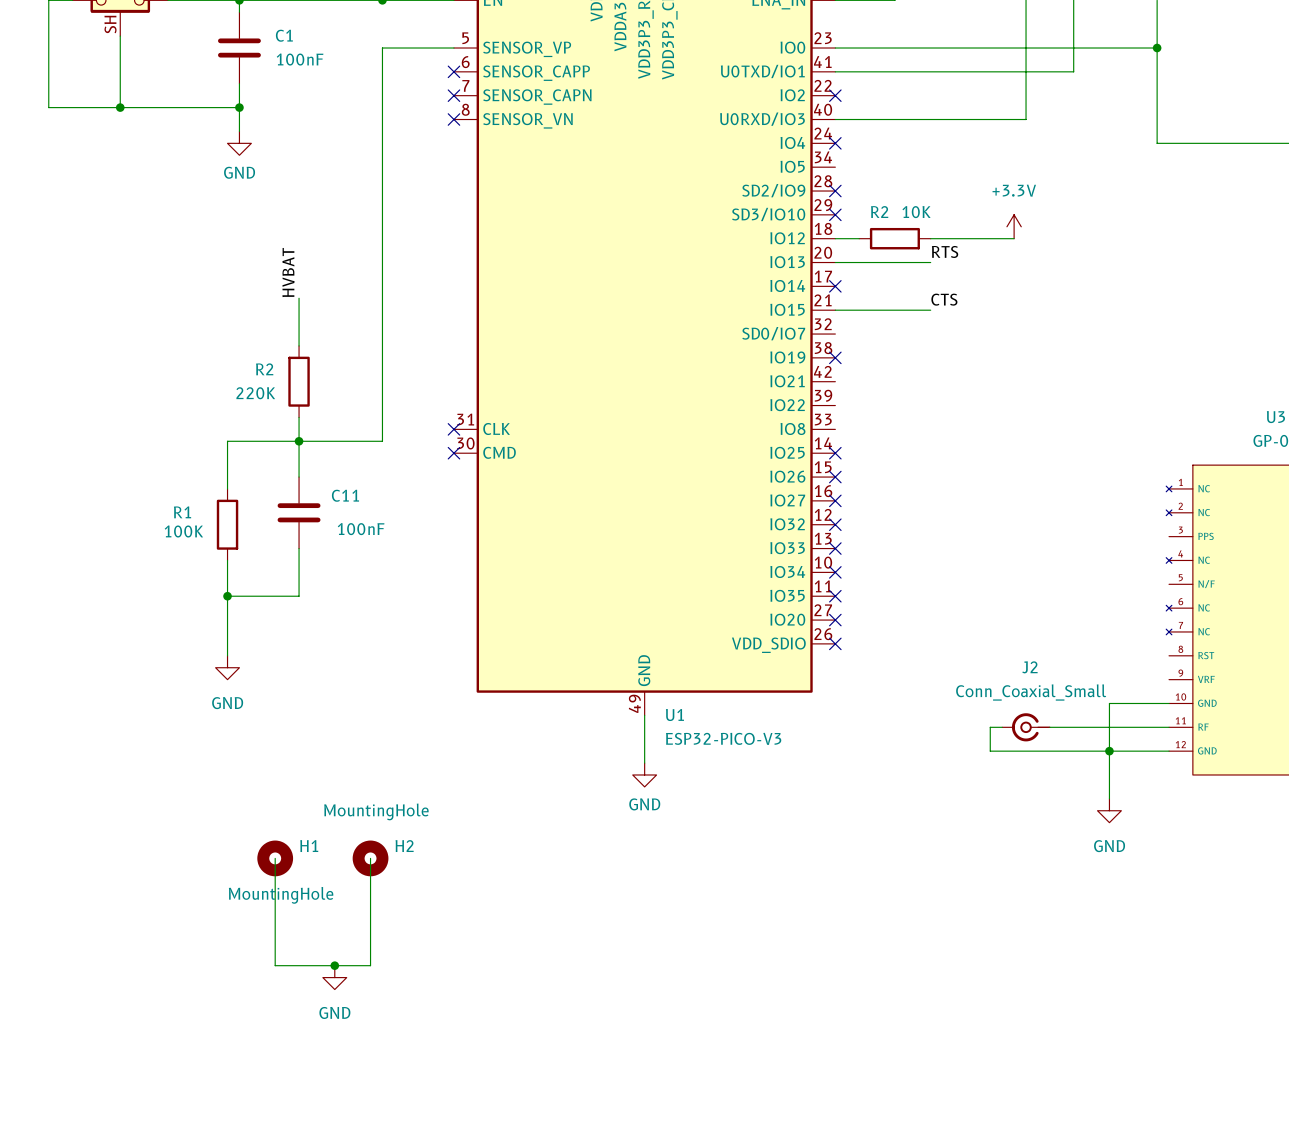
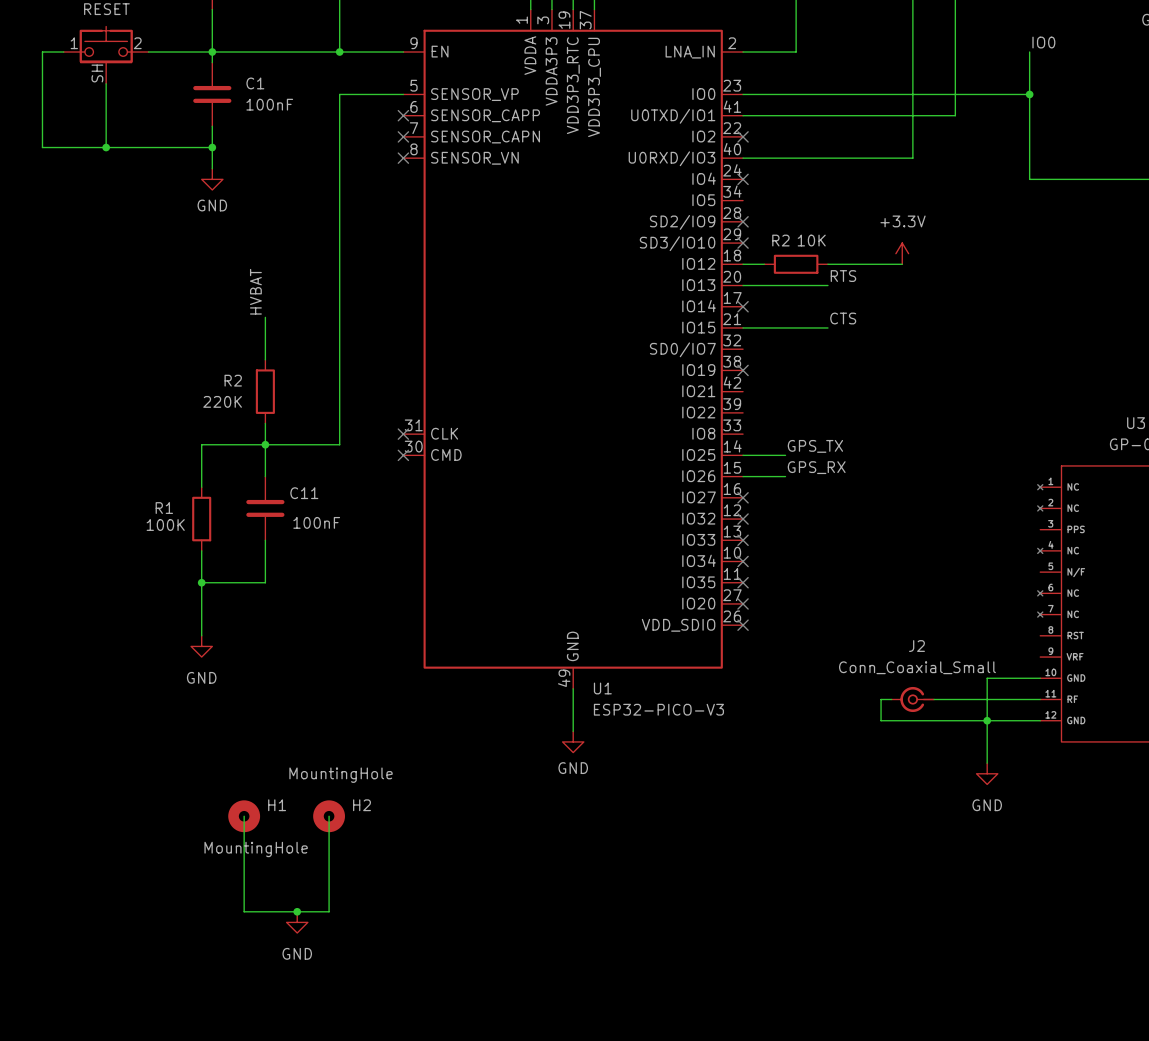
label: none -> GPS_TX (815, 446)
wire: none -> (743, 455) (785, 455)
no-connect mark: (835, 453) -> none
label: none -> GPS_RX (816, 467)
wire: none -> (743, 476) (785, 476)
no-connect mark: (835, 477) -> none

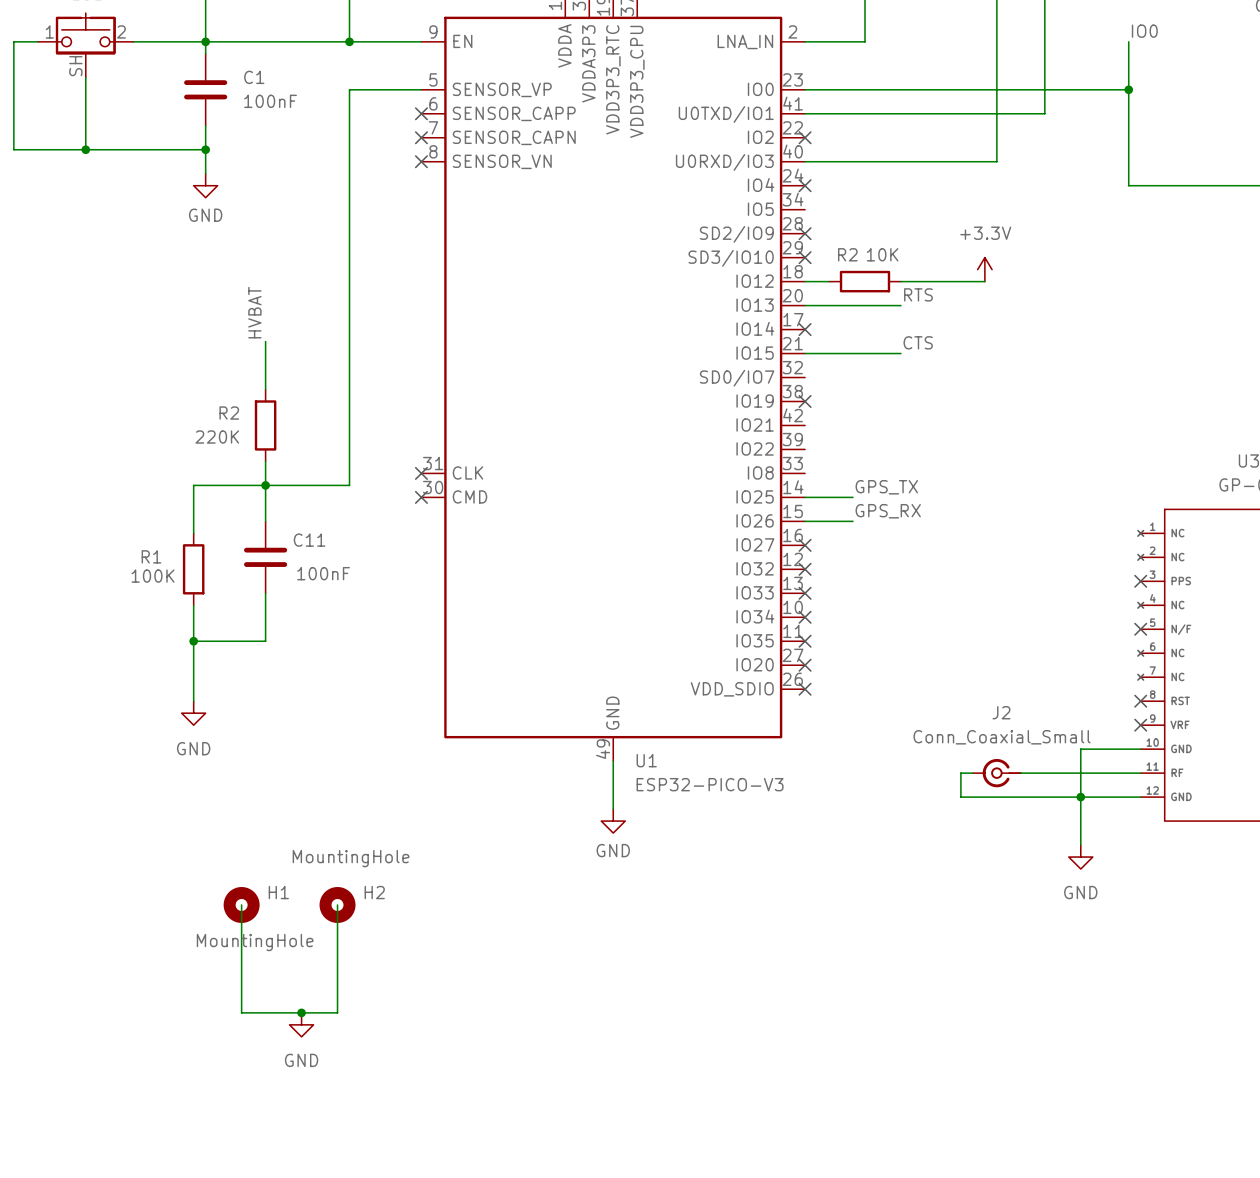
no-connect mark: none -> (1140, 581)
no-connect mark: none -> (1140, 629)
no-connect mark: none -> (1140, 701)
no-connect mark: none -> (1140, 725)

